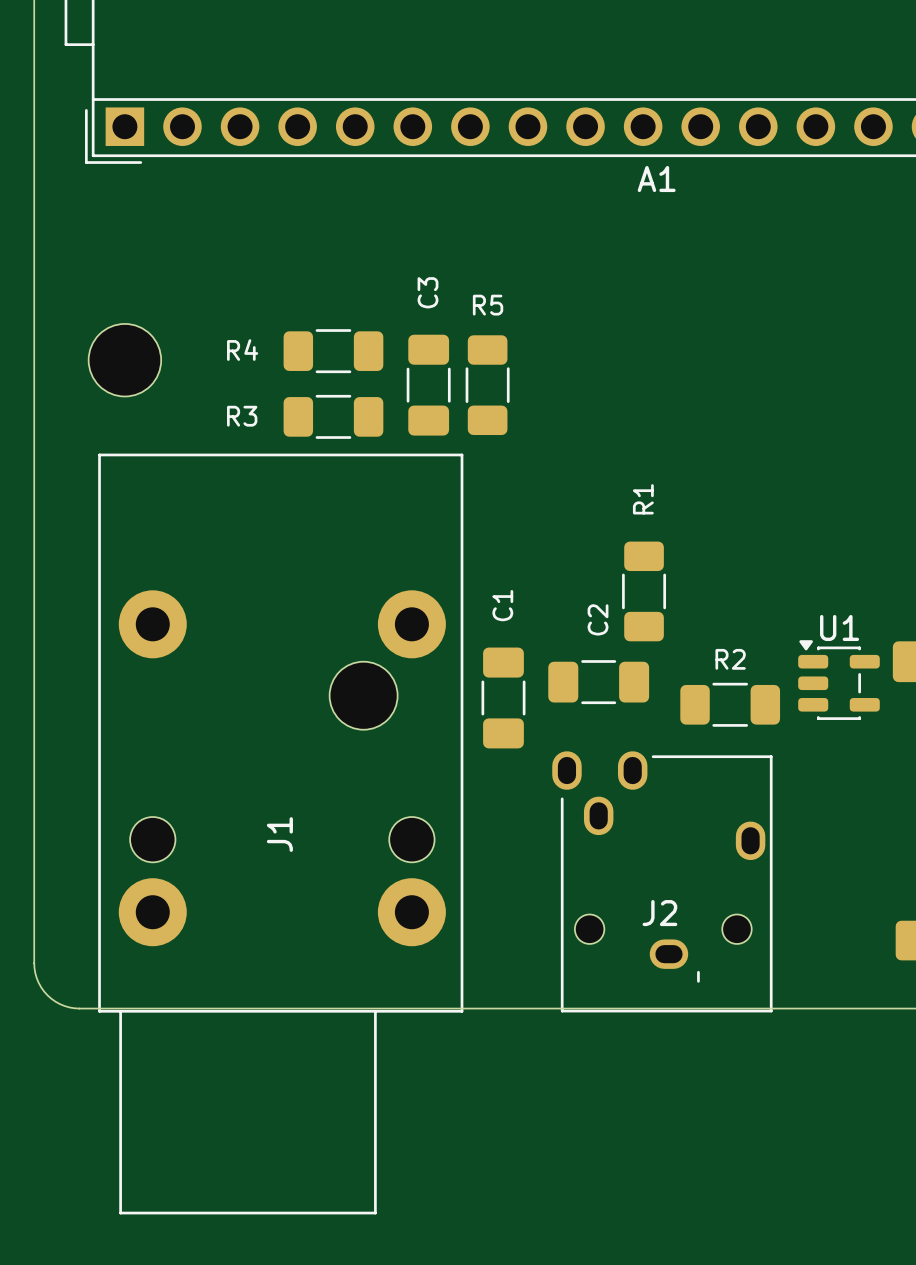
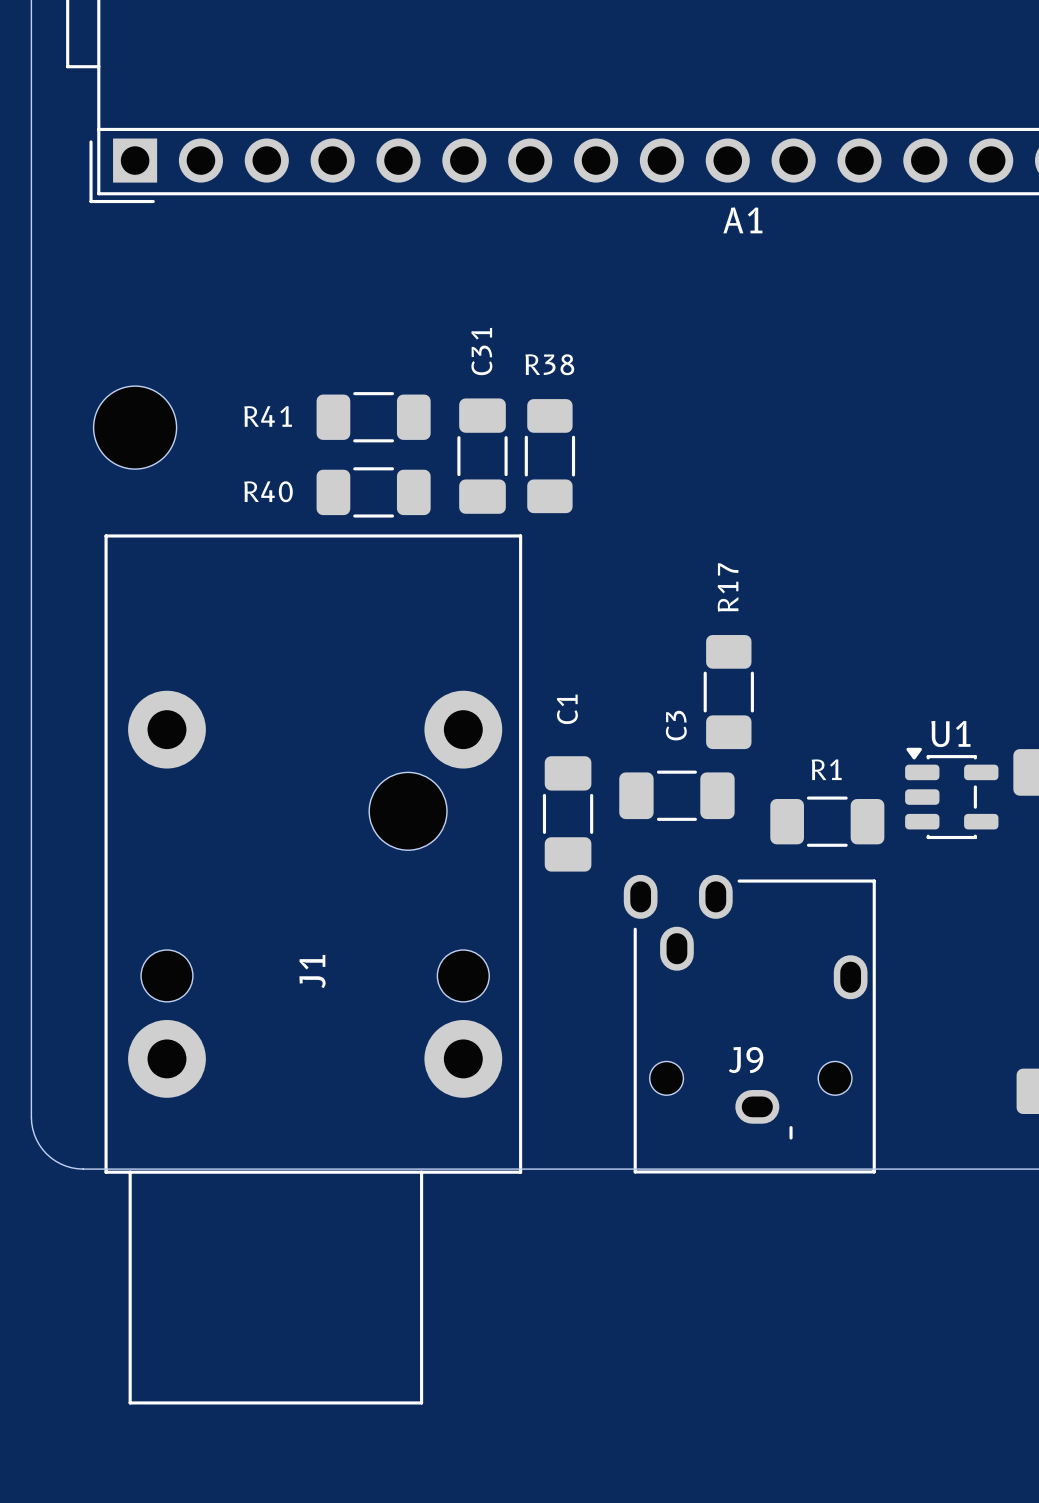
C3 name: C3 (428, 292) -> C31 (481, 351)
R5 name: R5 (488, 305) -> R38 (549, 364)
R4 name: R4 (242, 350) -> R41 (268, 416)
R3 name: R3 (242, 416) -> R40 (268, 491)
R1 name: R1 (643, 499) -> R17 (728, 587)
C2 name: C2 (598, 619) -> C3 (676, 725)
R2 name: R2 (730, 659) -> R1 (826, 769)
J2 name: J2 (659, 913) -> J9 (746, 1060)

